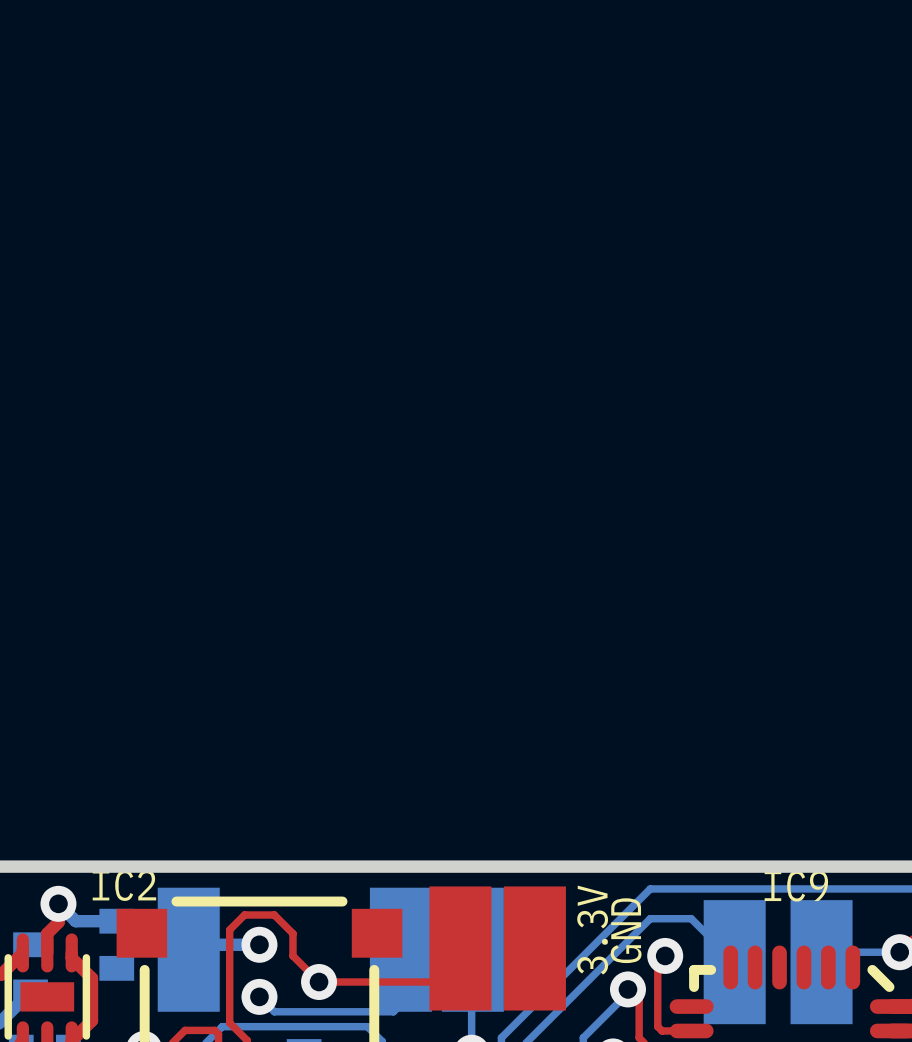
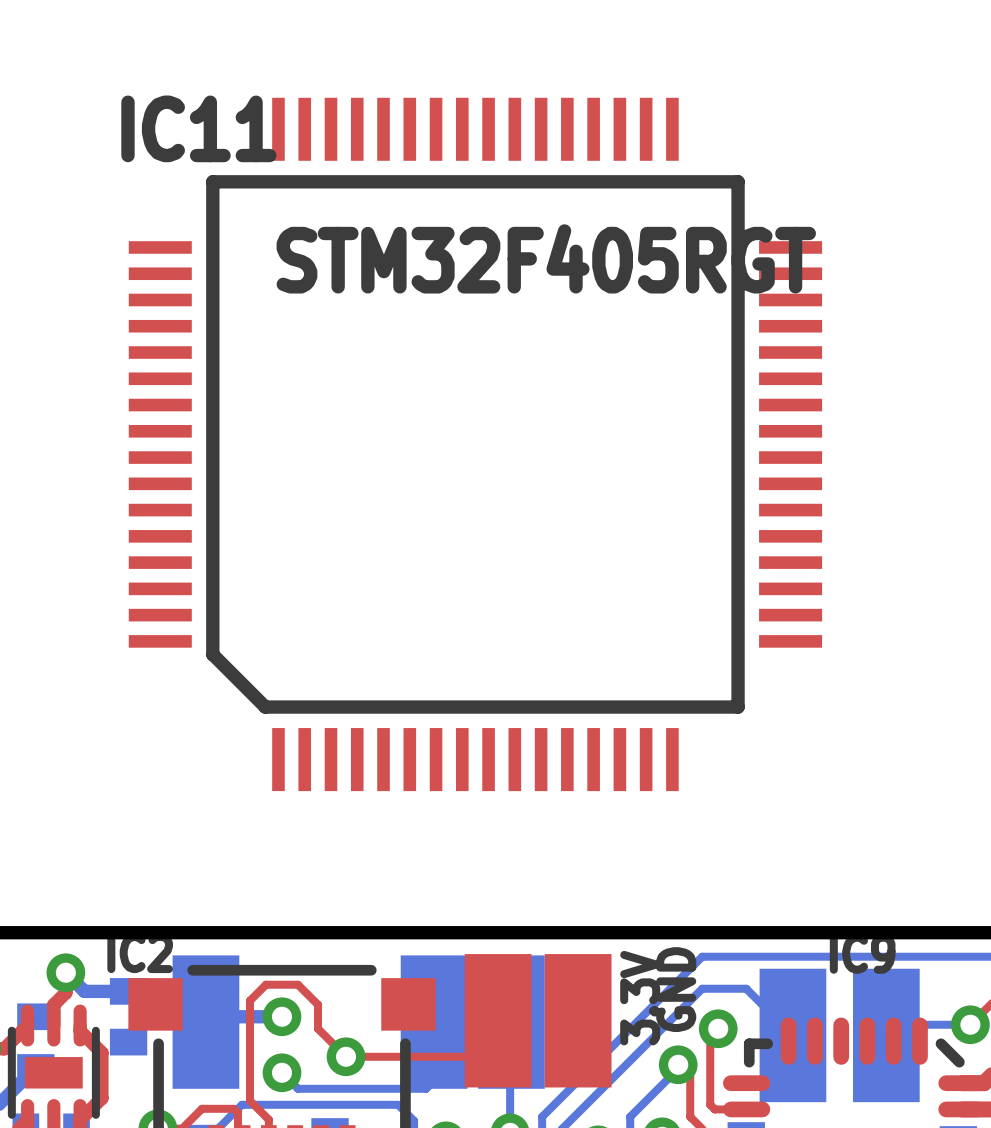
IC11: none -> STM32F405RGT (475, 444)

